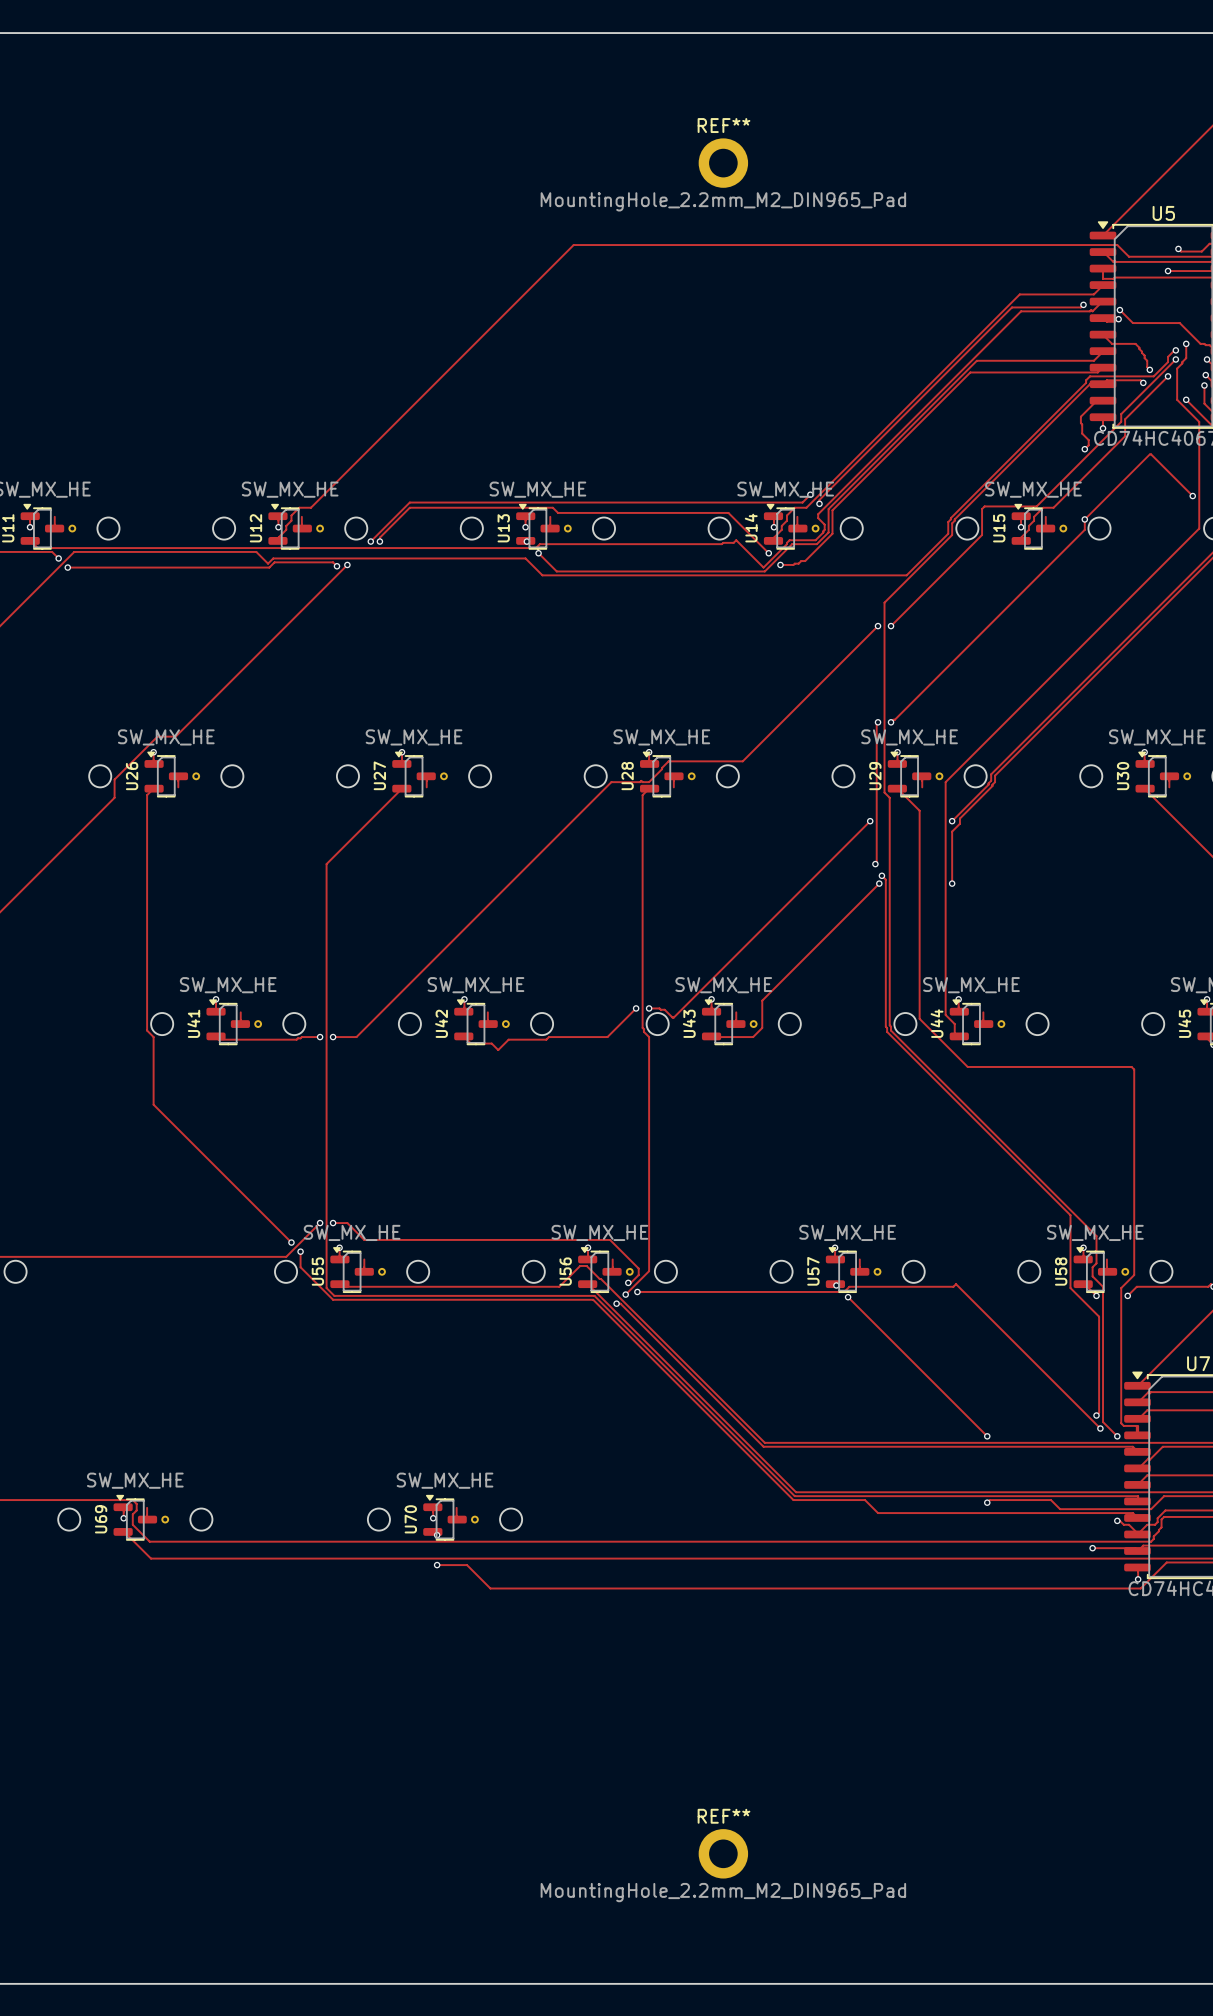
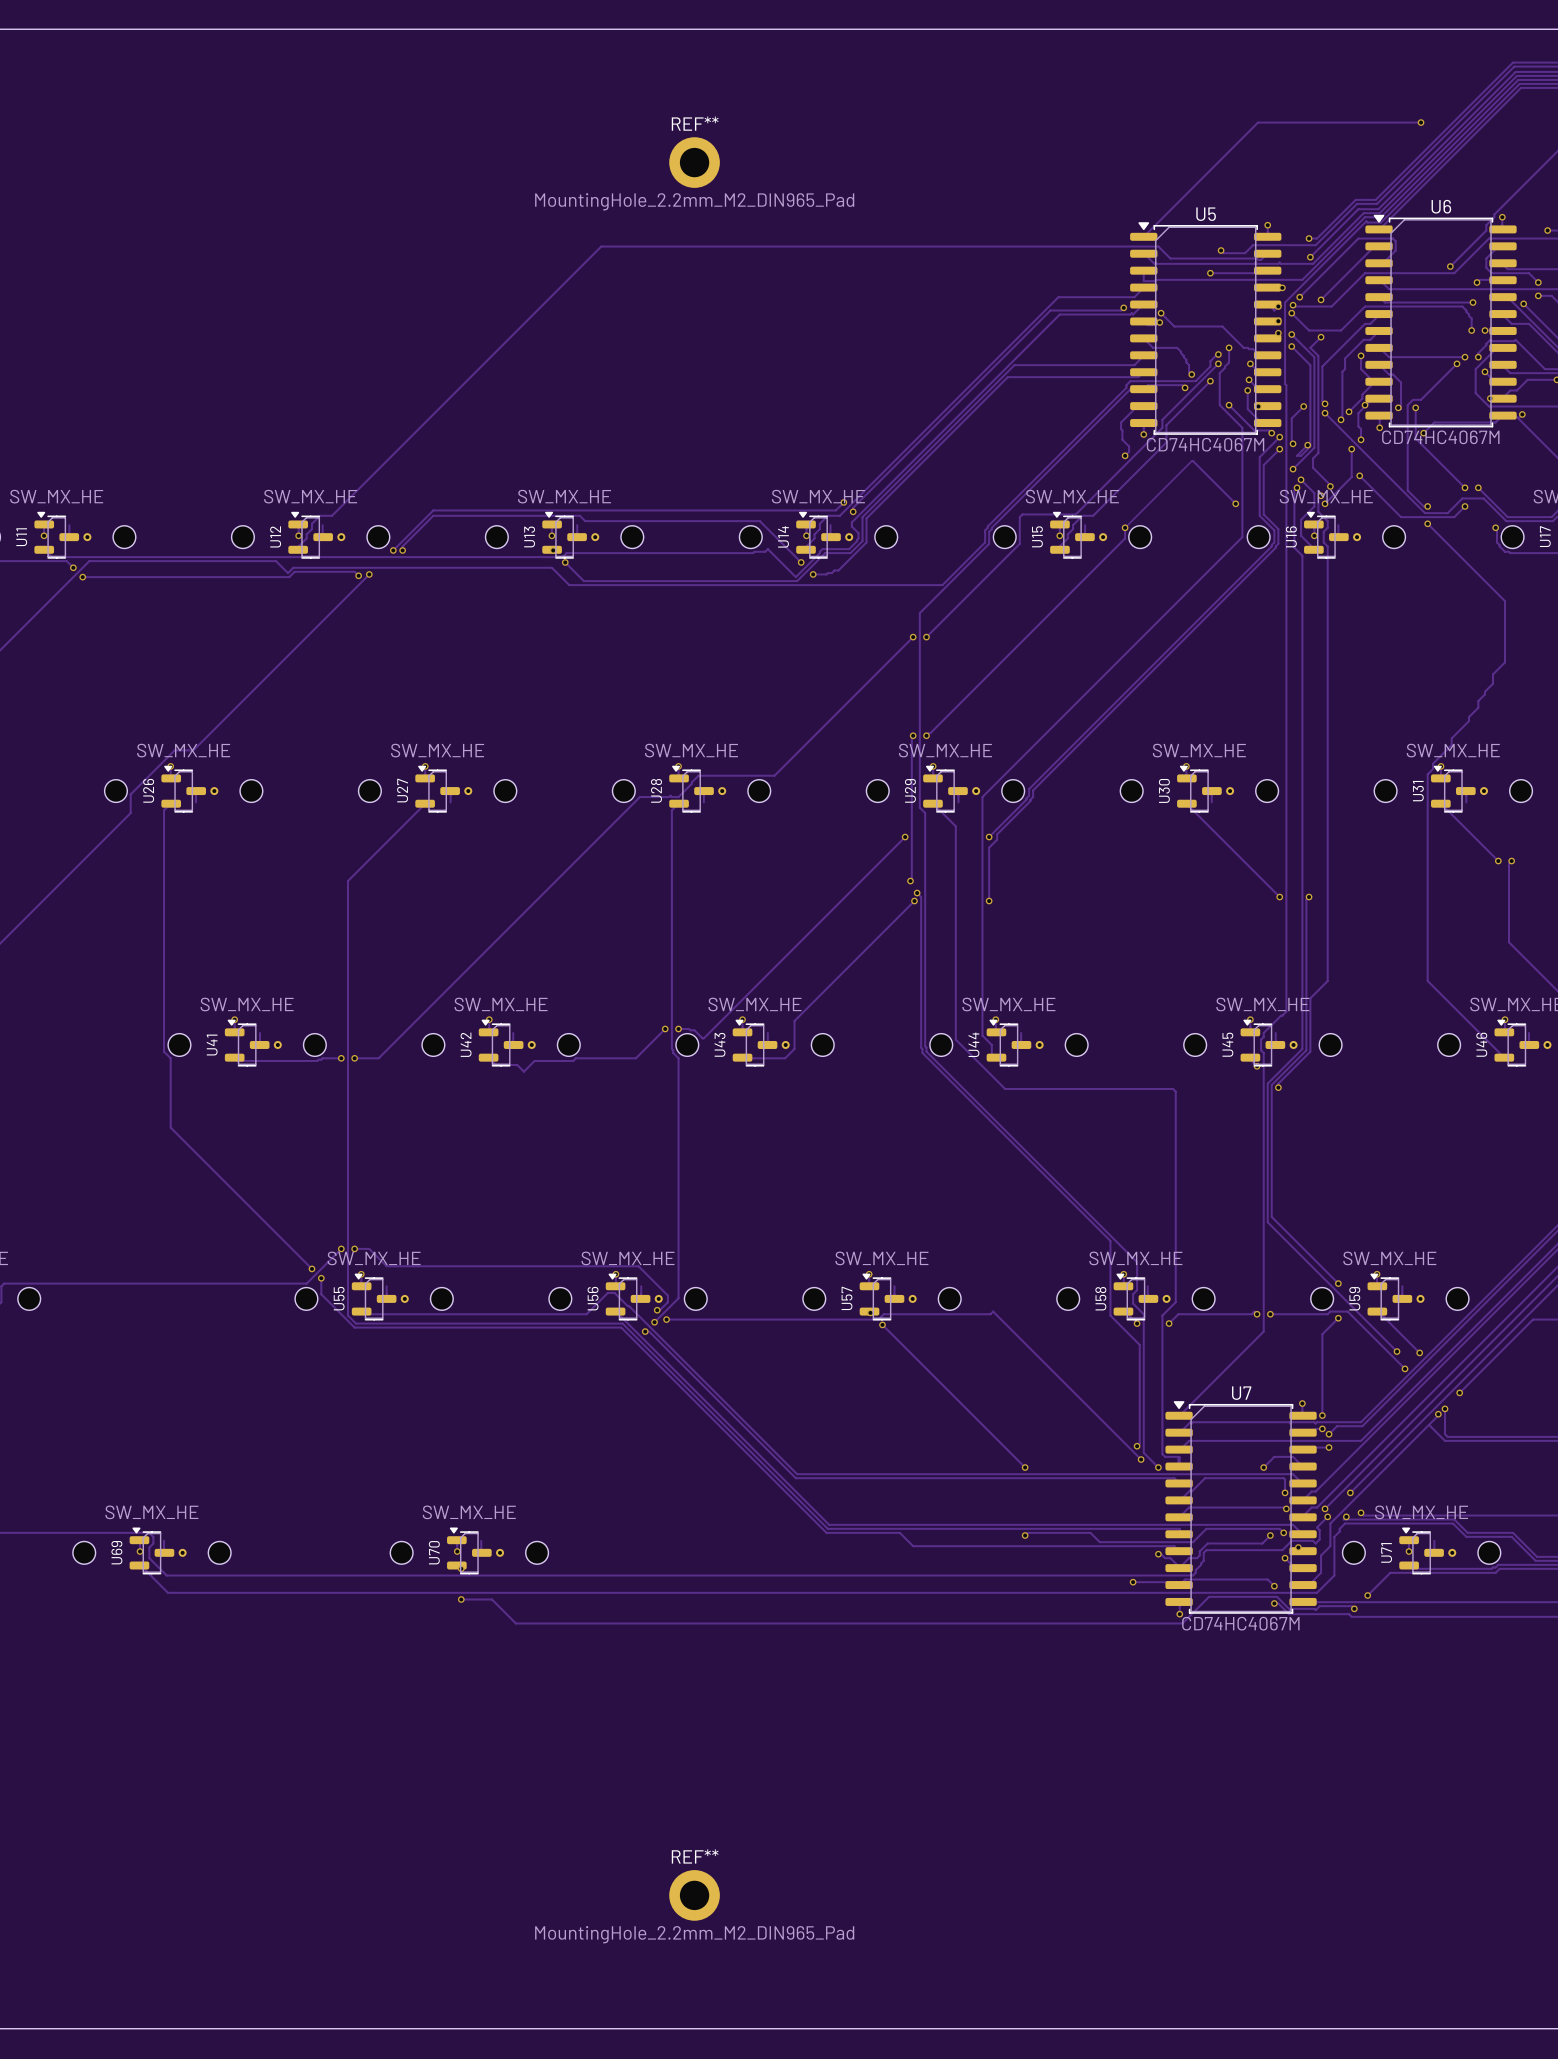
REF** position: (723, 163) -> (694, 162)
REF** position: (723, 1853) -> (694, 1895)

